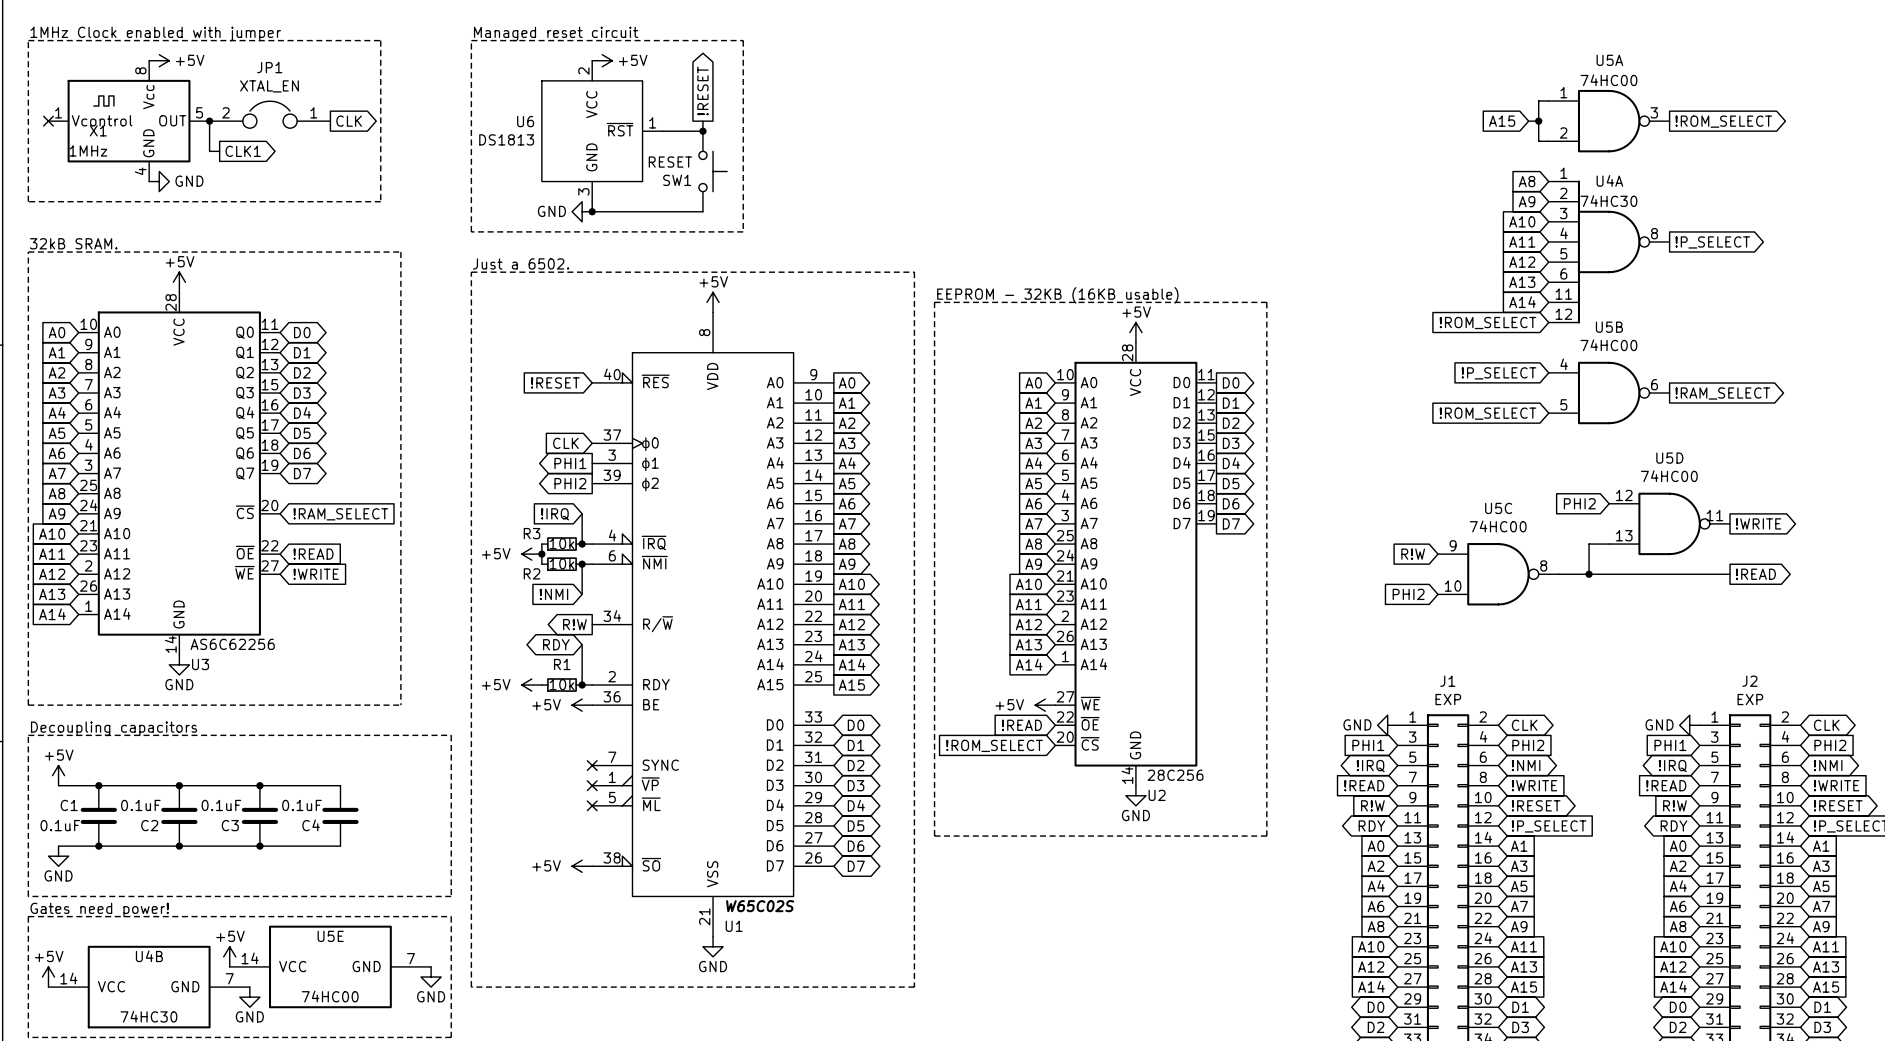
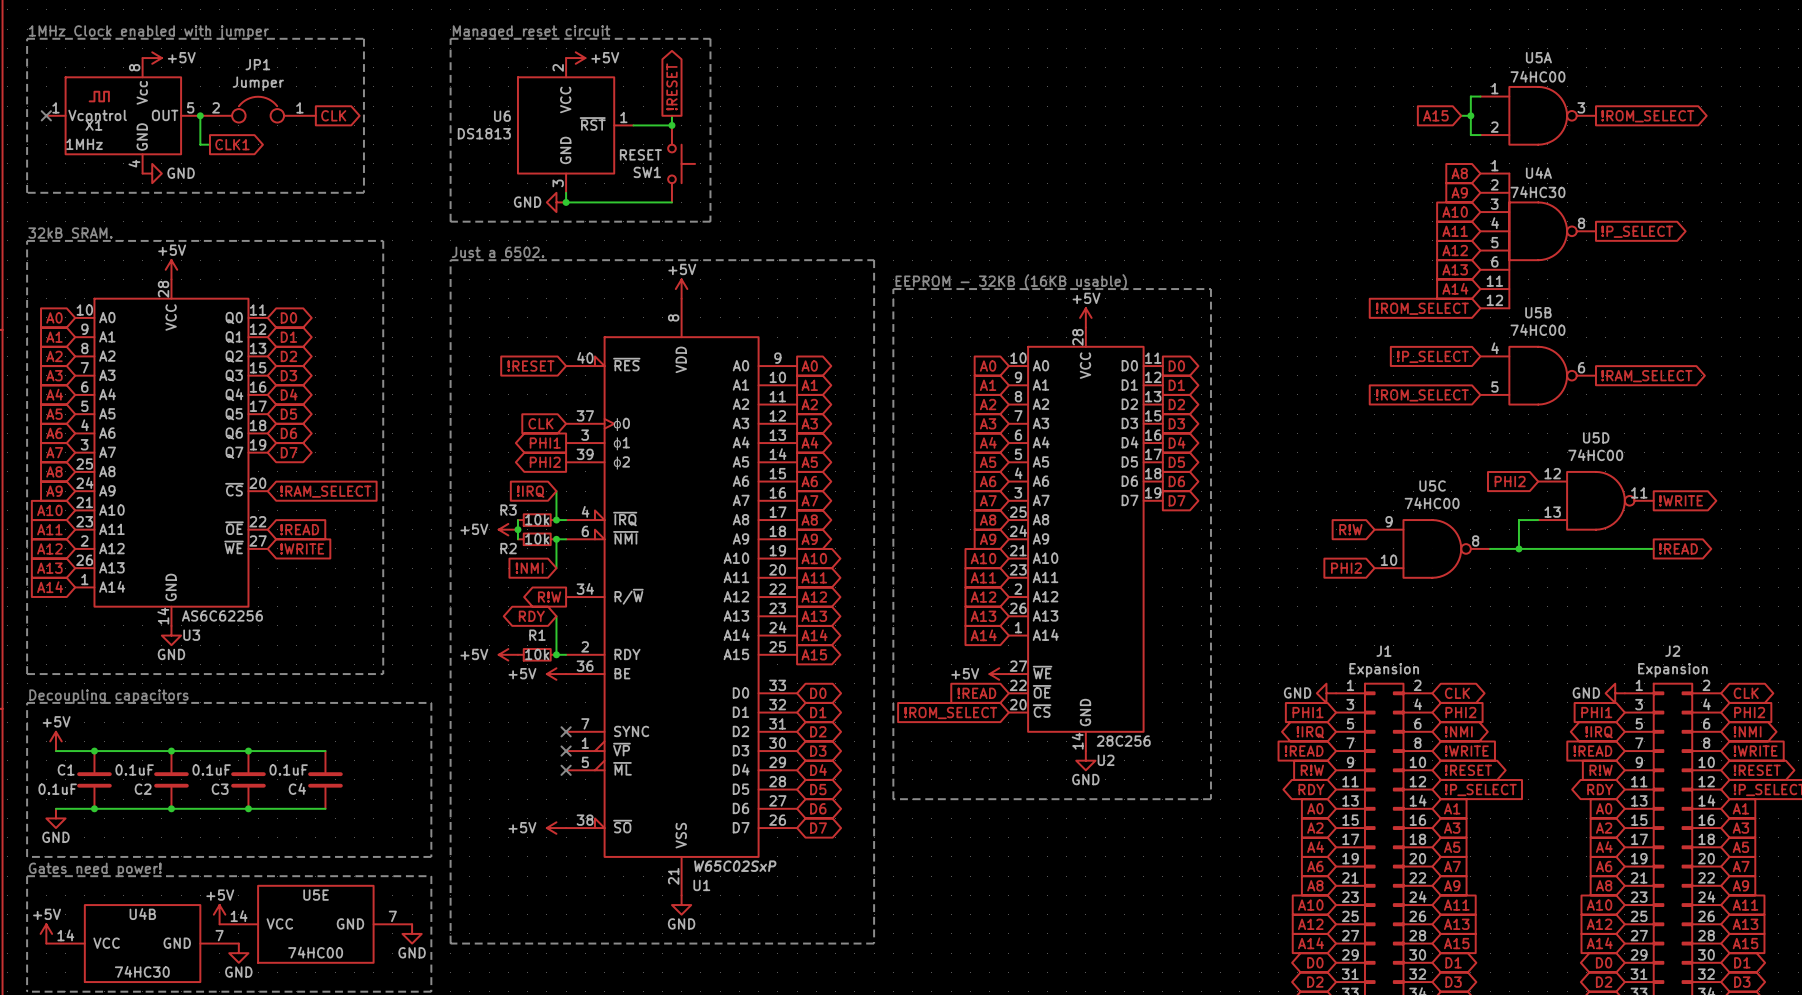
JP1 value: XTAL_EN (269, 86) -> Jumper (258, 83)
J1 value: EXP (1448, 699) -> Expansion (1384, 670)
J2 value: EXP (1750, 699) -> Expansion (1672, 670)
U1 value: W65C02S (760, 906) -> W65C02SxP (735, 866)

